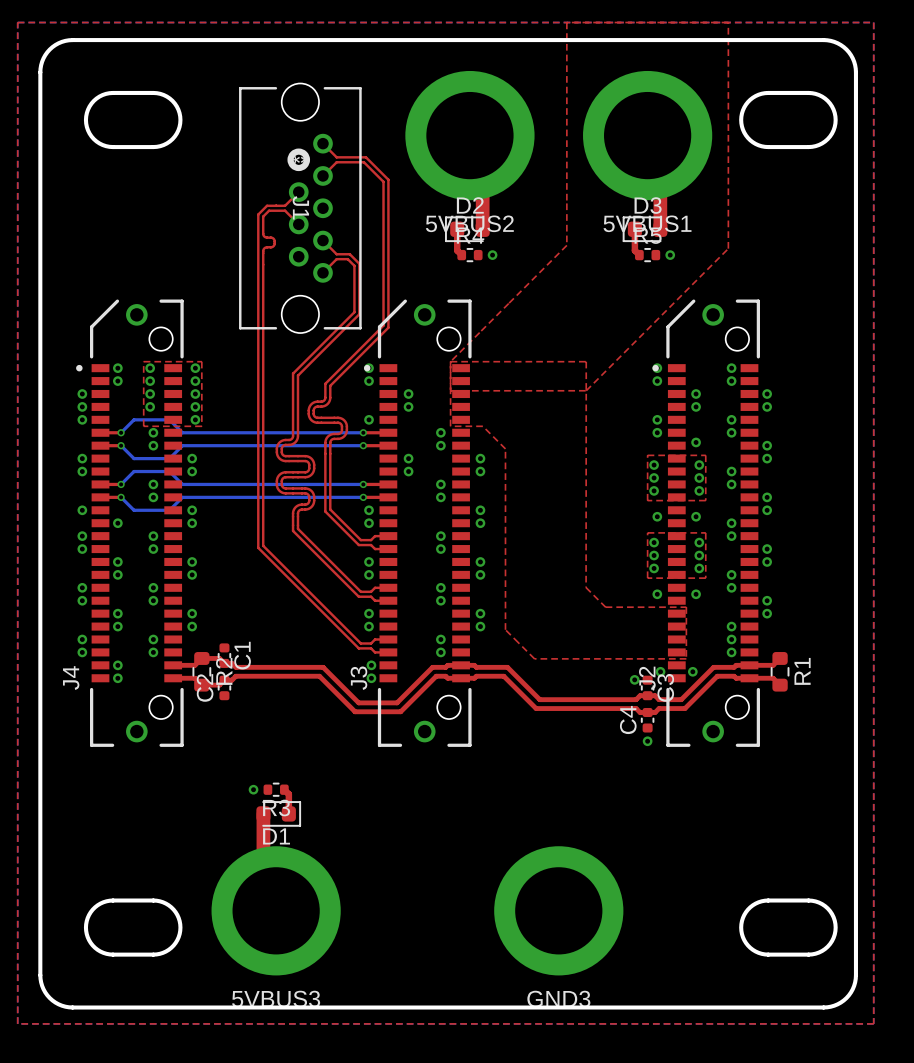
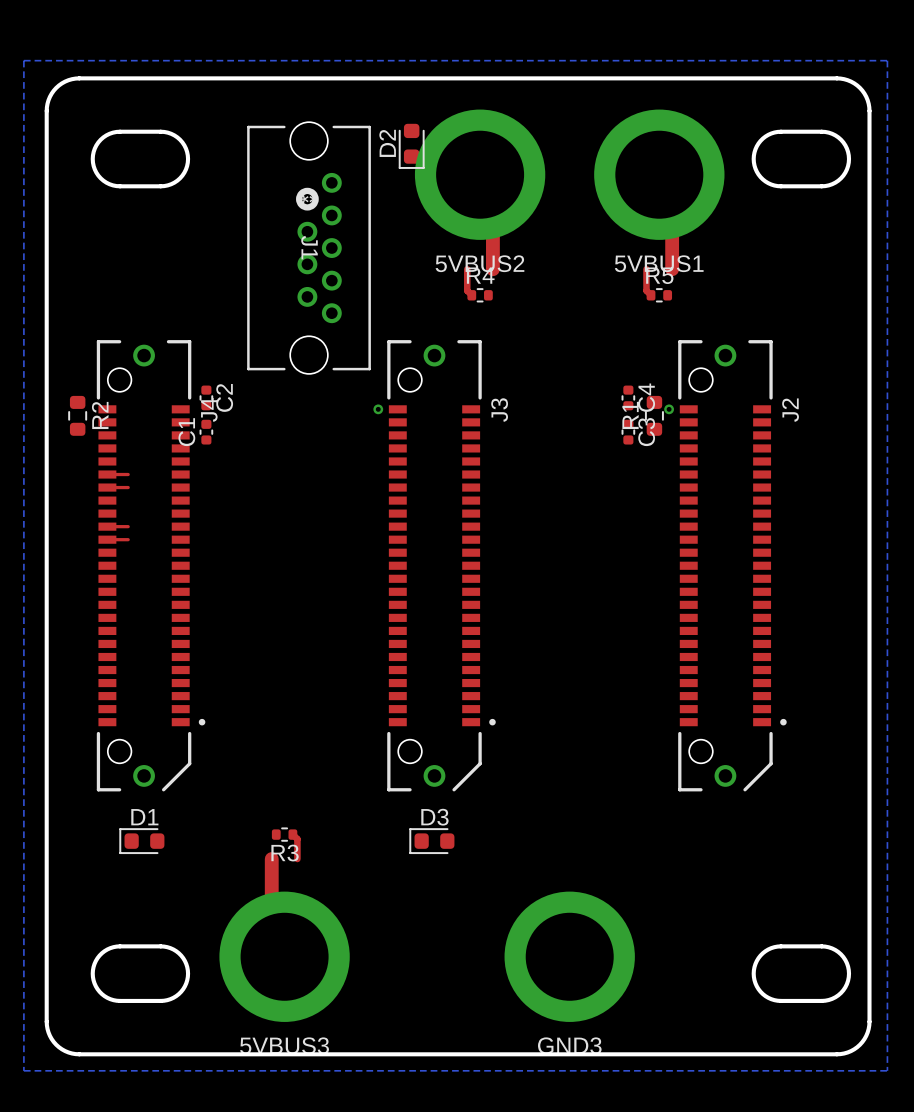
top zone outline: (17, 22) (873, 22) (873, 1023) (17, 1023) (17, 22) -> none
top zone outline: (566, 22) (566, 245) (450, 361) -> none
top zone outline: (728, 22) (728, 248) (586, 390) (450, 390) (450, 361) -> none
top track: (322, 143) (336, 157) (365, 157) (388, 179) (388, 327) (330, 385) (330, 398) (327, 403) (315, 406) (313, 410) (315, 417) (339, 418) (344, 420) (346, 425) (344, 436) (332, 439) (330, 441) (330, 509) (360, 540) (371, 540) (375, 536) (388, 536) -> none
top track: (322, 175) (336, 162) (363, 162) (383, 181) (383, 325) (325, 383) (324, 399) (312, 403) (308, 413) (310, 418) (314, 422) (338, 422) (341, 426) (340, 433) (330, 434) (325, 440) (325, 511) (358, 545) (371, 545) (375, 549) (388, 549) -> none
top track: (298, 192) (285, 205) (267, 205) (258, 214) (258, 547) (358, 648) (371, 648) (375, 652) (388, 652) -> none
top track: (298, 224) (285, 210) (269, 210) (263, 216) (263, 235) (272, 238) (274, 241) (273, 246) (265, 247) (263, 251) (263, 545) (360, 643) (371, 643) (375, 639) (388, 639) -> none
D2 rotation: 0° (467, 229) -> 90° counterclockwise (411, 146)
D2 position: (467, 229) -> (411, 146)
D3 position: (645, 229) -> (431, 841)
top track: (322, 240) (336, 254) (349, 254) (359, 263) (359, 314) (297, 375) (297, 437) (292, 444) (282, 446) (281, 453) (285, 456) (309, 457) (313, 462) (314, 469) (312, 473) (307, 476) (284, 477) (281, 485) (284, 488) (306, 488) (312, 491) (314, 497) (312, 505) (298, 512) (297, 528) (360, 591) (371, 591) (375, 587) (388, 587) -> none
via: (492, 255) -> none
via: (670, 255) -> none
top track: (322, 272) (336, 259) (347, 259) (354, 265) (354, 312) (293, 373) (292, 436) (290, 439) (279, 442) (277, 454) (283, 460) (306, 461) (309, 468) (305, 472) (281, 473) (277, 478) (277, 486) (282, 492) (305, 493) (309, 496) (308, 503) (298, 505) (293, 509) (293, 530) (358, 596) (371, 596) (375, 600) (388, 600) -> none
top zone outline: (143, 361) (201, 361) (201, 426) (143, 426) (143, 361) -> none
top zone outline: (450, 361) (450, 426) (482, 426) (505, 448) (505, 629) (534, 658) (686, 658) (686, 607) (605, 607) (586, 587) (586, 361) (450, 361) -> none
via: (117, 368) -> none
via: (150, 368) -> none
via: (195, 368) -> none
via: (731, 368) -> none
via: (117, 381) -> none
via: (150, 381) -> none
via: (195, 381) -> none
via: (369, 381) -> none
via: (657, 381) -> none
via: (731, 381) -> none
via: (82, 394) -> none
via: (150, 394) -> none
via: (195, 394) -> none
via: (408, 394) -> none
via: (696, 394) -> none
via: (767, 394) -> none
via: (82, 406) -> none
via: (150, 406) -> none
via: (195, 406) -> none
via: (408, 406) -> none
via: (696, 406) -> none
via: (767, 406) -> none
via: (82, 419) -> none
via: (195, 419) -> none
via: (369, 419) -> none
via: (657, 419) -> none
via: (731, 419) -> none
bottom track: (121, 432) (134, 419) (169, 419) (182, 432) (363, 432) -> none
via: (121, 432) -> none
via: (153, 432) -> none
top track: (363, 432) (388, 432) -> none
via: (363, 432) -> none
via: (440, 432) -> none
via: (657, 432) -> none
via: (731, 432) -> none
via: (696, 442) -> none
bottom track: (121, 445) (134, 458) (169, 458) (182, 445) (363, 445) -> none
via: (121, 445) -> none
via: (153, 445) -> none
top track: (363, 445) (388, 445) -> none
via: (363, 445) -> none
via: (440, 445) -> none
via: (767, 445) -> none
top zone outline: (647, 455) (647, 500) (705, 500) (705, 455) (647, 455) -> none
via: (82, 458) -> none
via: (192, 458) -> none
via: (408, 458) -> none
via: (480, 458) -> none
via: (767, 458) -> none
via: (654, 465) -> none
via: (699, 465) -> none
via: (82, 471) -> none
via: (192, 471) -> none
via: (408, 471) -> none
via: (480, 471) -> none
via: (731, 471) -> none
via: (654, 477) -> none
via: (699, 477) -> none
bottom track: (121, 484) (134, 471) (169, 471) (182, 484) (363, 484) -> none
via: (121, 484) -> none
via: (153, 484) -> none
top track: (363, 484) (388, 484) -> none
via: (363, 484) -> none
via: (440, 484) -> none
via: (731, 484) -> none
via: (654, 490) -> none
via: (699, 490) -> none
bottom track: (121, 497) (134, 510) (169, 510) (182, 497) (363, 497) -> none
via: (121, 497) -> none
via: (153, 497) -> none
top track: (363, 497) (388, 497) -> none
via: (363, 497) -> none
via: (440, 497) -> none
via: (767, 497) -> none
via: (82, 510) -> none
via: (192, 510) -> none
via: (369, 510) -> none
via: (480, 510) -> none
via: (767, 510) -> none
via: (657, 516) -> none
via: (696, 516) -> none
via: (117, 523) -> none
J4 rotation: 0° (129, 523) -> 180° (151, 565)
via: (192, 523) -> none
via: (369, 523) -> none
J3 rotation: 0° (417, 523) -> 180° (441, 565)
via: (480, 523) -> none
J2 rotation: 0° (706, 523) -> 180° (732, 565)
via: (731, 523) -> none
top zone outline: (647, 532) (705, 532) (705, 578) (647, 578) (647, 532) -> none
via: (82, 536) -> none
via: (153, 536) -> none
via: (440, 536) -> none
via: (731, 536) -> none
via: (654, 542) -> none
via: (699, 542) -> none
via: (82, 549) -> none
via: (153, 549) -> none
via: (440, 549) -> none
via: (767, 549) -> none
via: (654, 555) -> none
via: (699, 555) -> none
via: (117, 561) -> none
via: (192, 561) -> none
via: (369, 561) -> none
via: (480, 561) -> none
via: (767, 561) -> none
via: (654, 568) -> none
via: (699, 568) -> none
via: (117, 574) -> none
via: (192, 574) -> none
via: (369, 574) -> none
via: (480, 574) -> none
via: (731, 574) -> none
via: (82, 587) -> none
via: (153, 587) -> none
via: (440, 587) -> none
via: (731, 587) -> none
via: (657, 594) -> none
via: (696, 594) -> none
via: (82, 600) -> none
via: (153, 600) -> none
via: (440, 600) -> none
via: (767, 600) -> none
via: (117, 613) -> none
via: (192, 613) -> none
via: (369, 613) -> none
via: (480, 613) -> none
via: (767, 613) -> none
via: (117, 626) -> none
via: (192, 626) -> none
via: (369, 626) -> none
via: (480, 626) -> none
via: (731, 626) -> none
via: (82, 639) -> none
via: (153, 639) -> none
via: (440, 639) -> none
via: (731, 639) -> none
via: (82, 652) -> none
via: (153, 652) -> none
via: (440, 652) -> none
via: (731, 652) -> none
C1 position: (224, 655) -> (206, 432)
C1 name position: C1 (242, 655) -> C1 (186, 432)
top track: (780, 658) (773, 665) (713, 667) (681, 699) (659, 699) (655, 695) (640, 695) (636, 699) (539, 699) (507, 667) (447, 665) (445, 667) (432, 667) (397, 702) (358, 702) (323, 667) (235, 667) (231, 663) (224, 663) (219, 658) (201, 658) (194, 665) (173, 665) -> none
via: (117, 665) -> none
via: (371, 665) -> none
R2 position: (201, 671) -> (77, 415)
via: (660, 671) -> none
via: (692, 671) -> none
R1 position: (780, 671) -> (654, 415)
R1 name position: R1 (802, 671) -> R1 (630, 415)
via: (117, 678) -> none
top track: (173, 678) (194, 678) (201, 685) (219, 685) (224, 680) (231, 680) (235, 676) (319, 676) (355, 711) (400, 711) (436, 676) (445, 676) (447, 678) (503, 676) (536, 708) (636, 708) (640, 712) (655, 712) (659, 708) (684, 708) (717, 676) (773, 678) (780, 685) -> none
via: (371, 678) -> none
via: (634, 679) -> none
C2 name position: C2 (205, 687) -> C2 (224, 397)
C2 position: (224, 687) -> (206, 397)
C3 position: (647, 687) -> (628, 432)
C4 name position: C4 (628, 720) -> C4 (646, 397)
C4 position: (647, 720) -> (628, 397)
via: (647, 741) -> none
via: (253, 789) -> none
D1 rotation: 0° (278, 813) -> 180° (141, 841)
D1 position: (278, 813) -> (141, 841)

